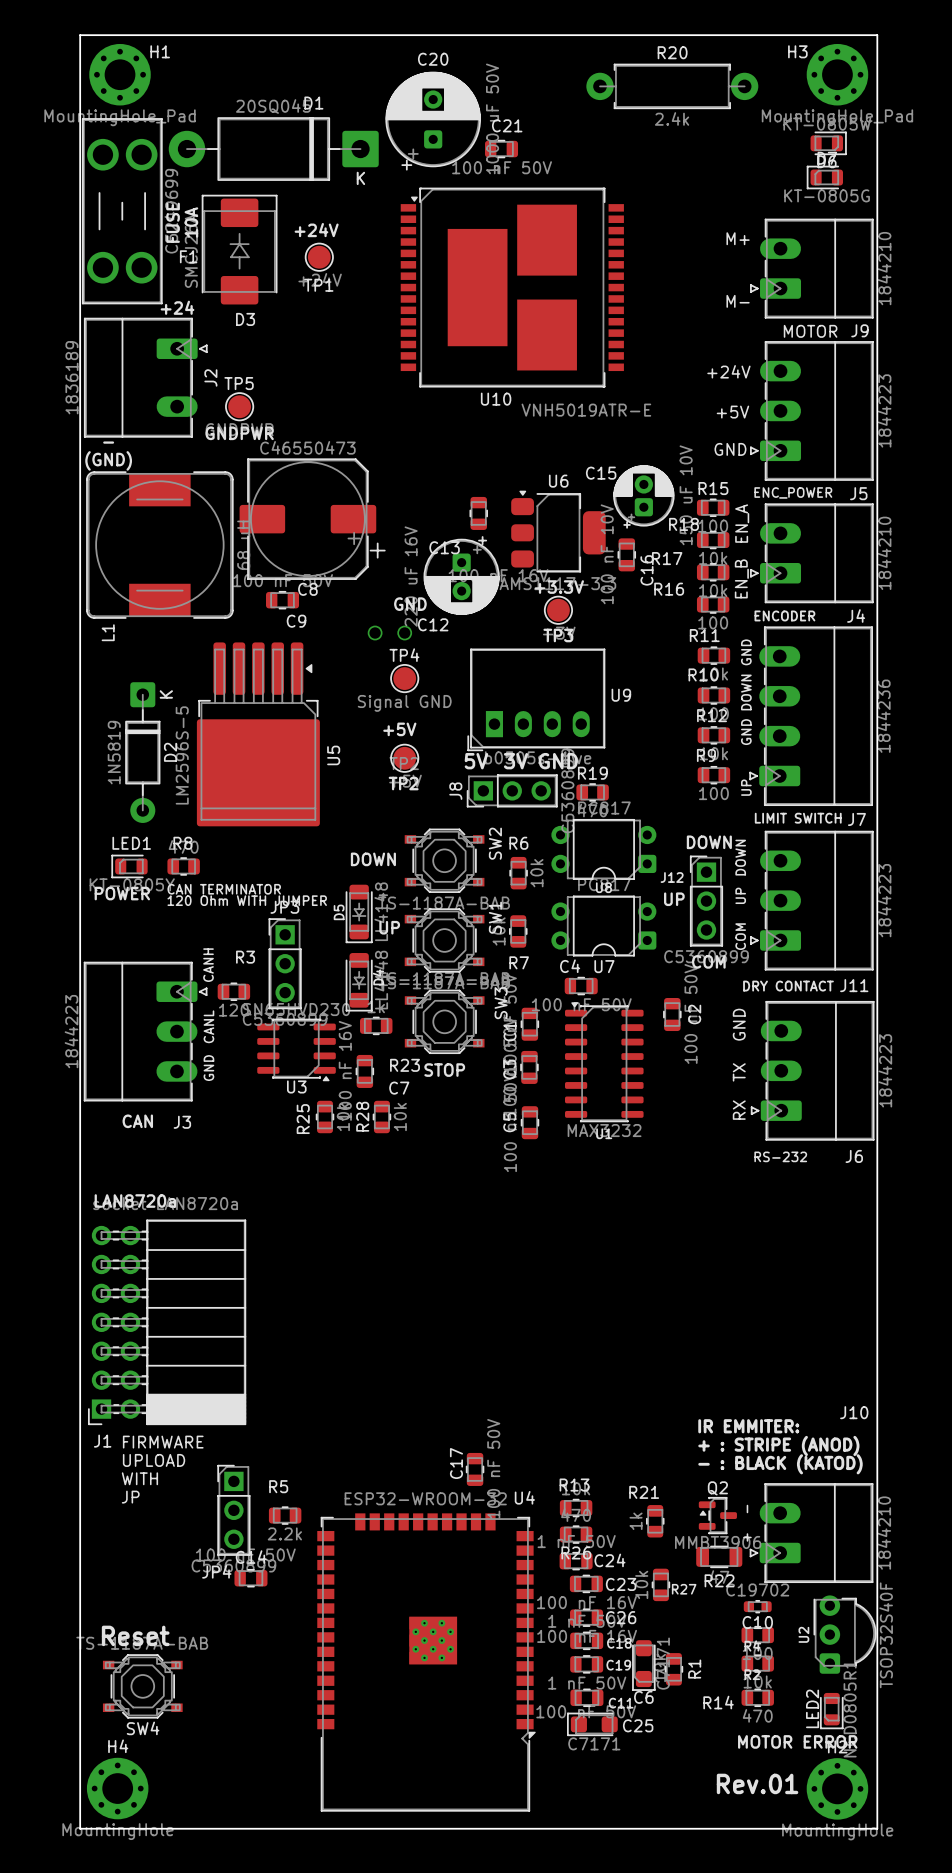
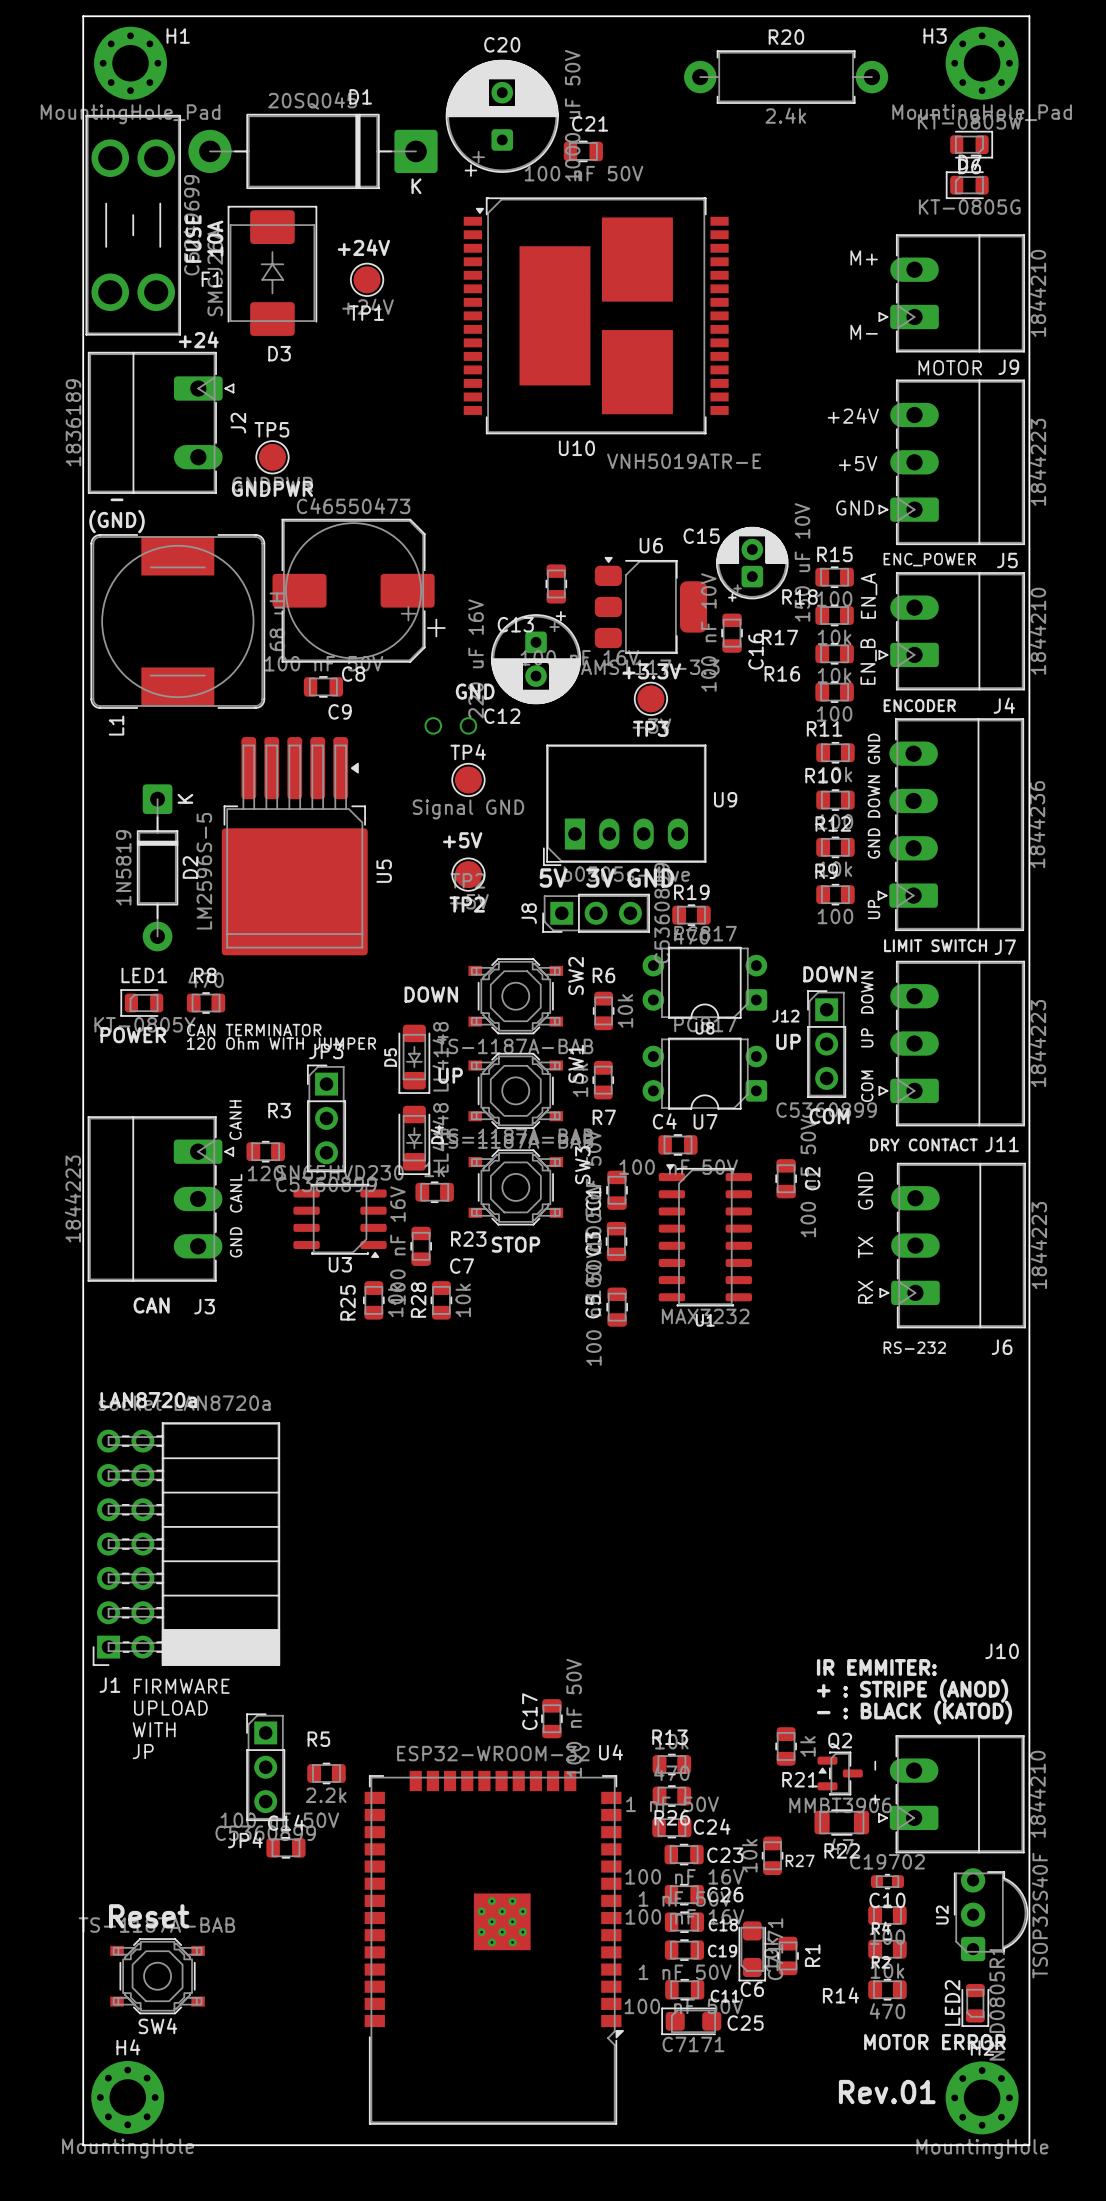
R21 name position: R21 (644, 1492) -> R21 (799, 1779)
R21 value position: 1k (636, 1521) -> 1k (807, 1746)
R21 position: (655, 1521) -> (786, 1746)

